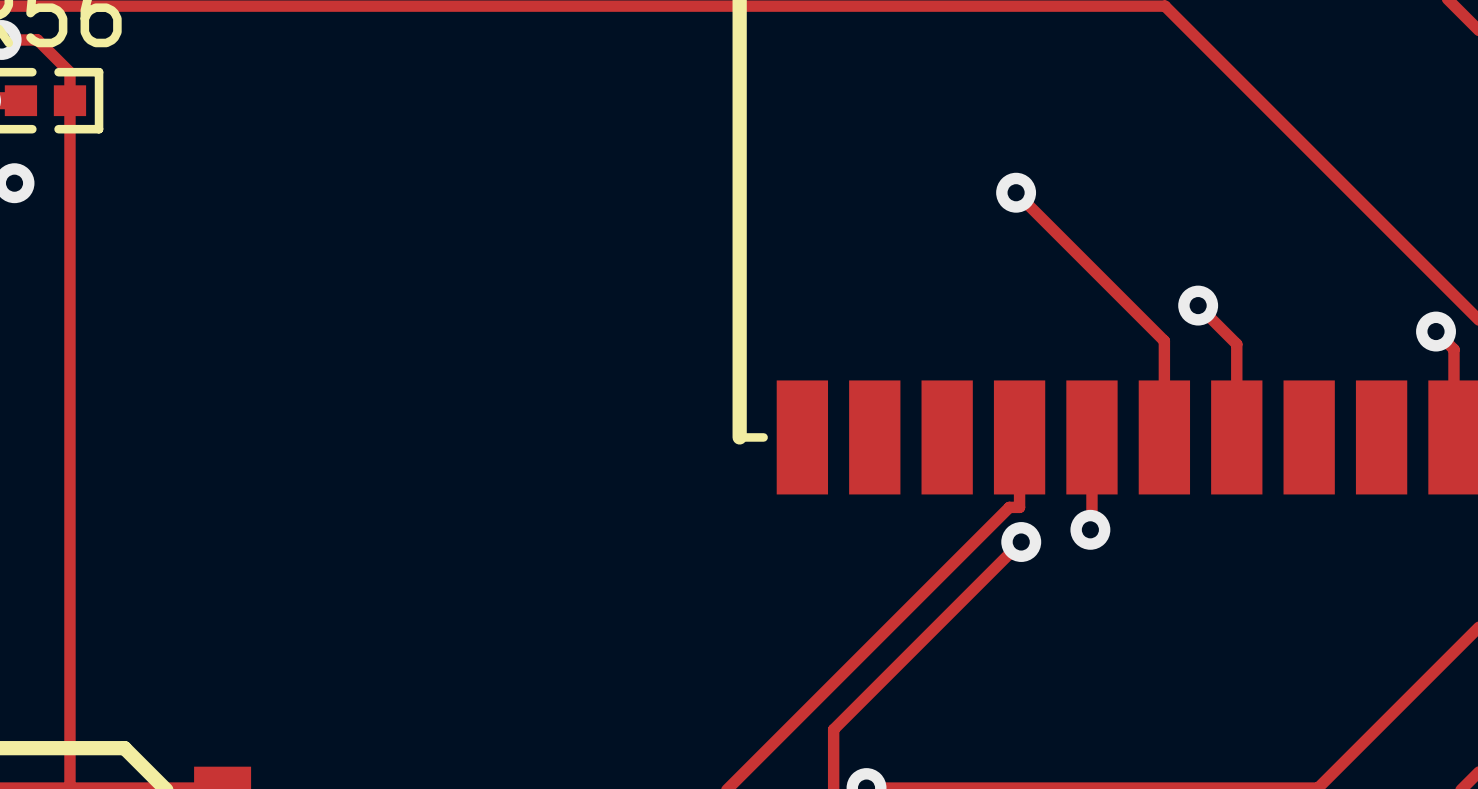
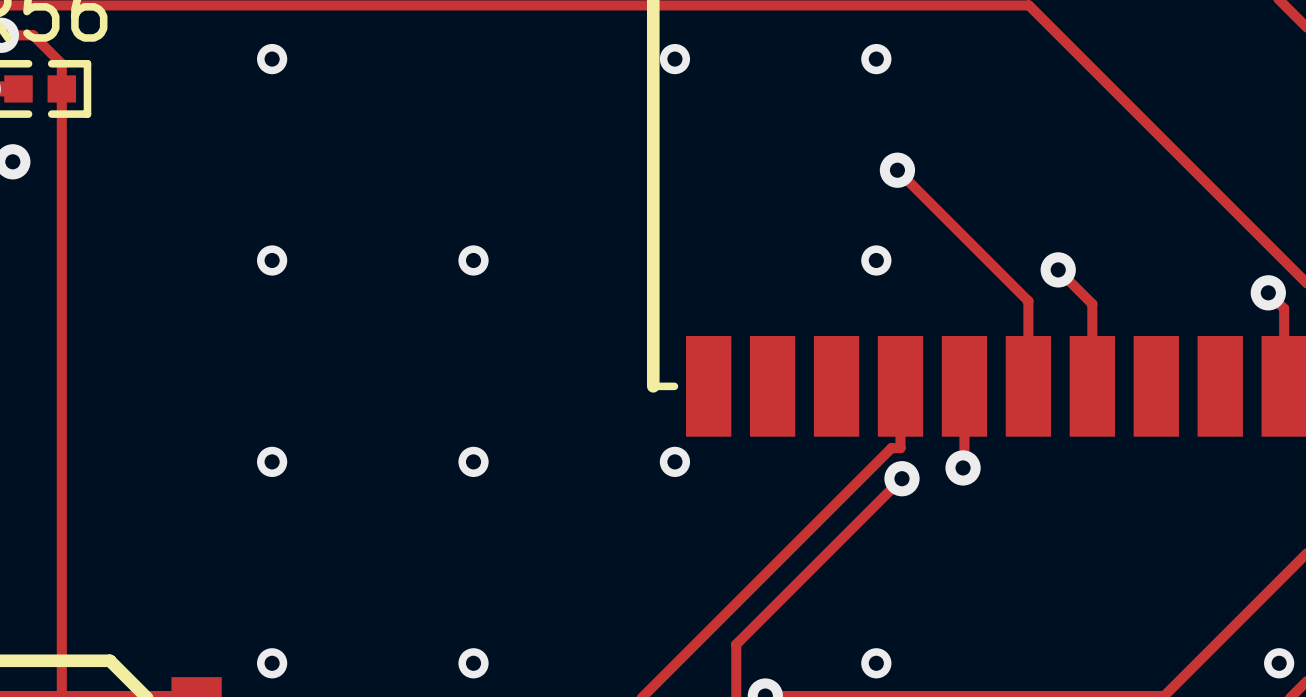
via: none -> (272, 59)
via: none -> (674, 59)
via: none -> (876, 59)
via: none -> (272, 260)
via: none -> (473, 260)
via: none -> (876, 260)
via: none -> (272, 461)
via: none -> (473, 461)
via: none -> (674, 461)
via: none -> (272, 663)
via: none -> (473, 663)
via: none -> (876, 663)
via: none -> (1279, 663)

